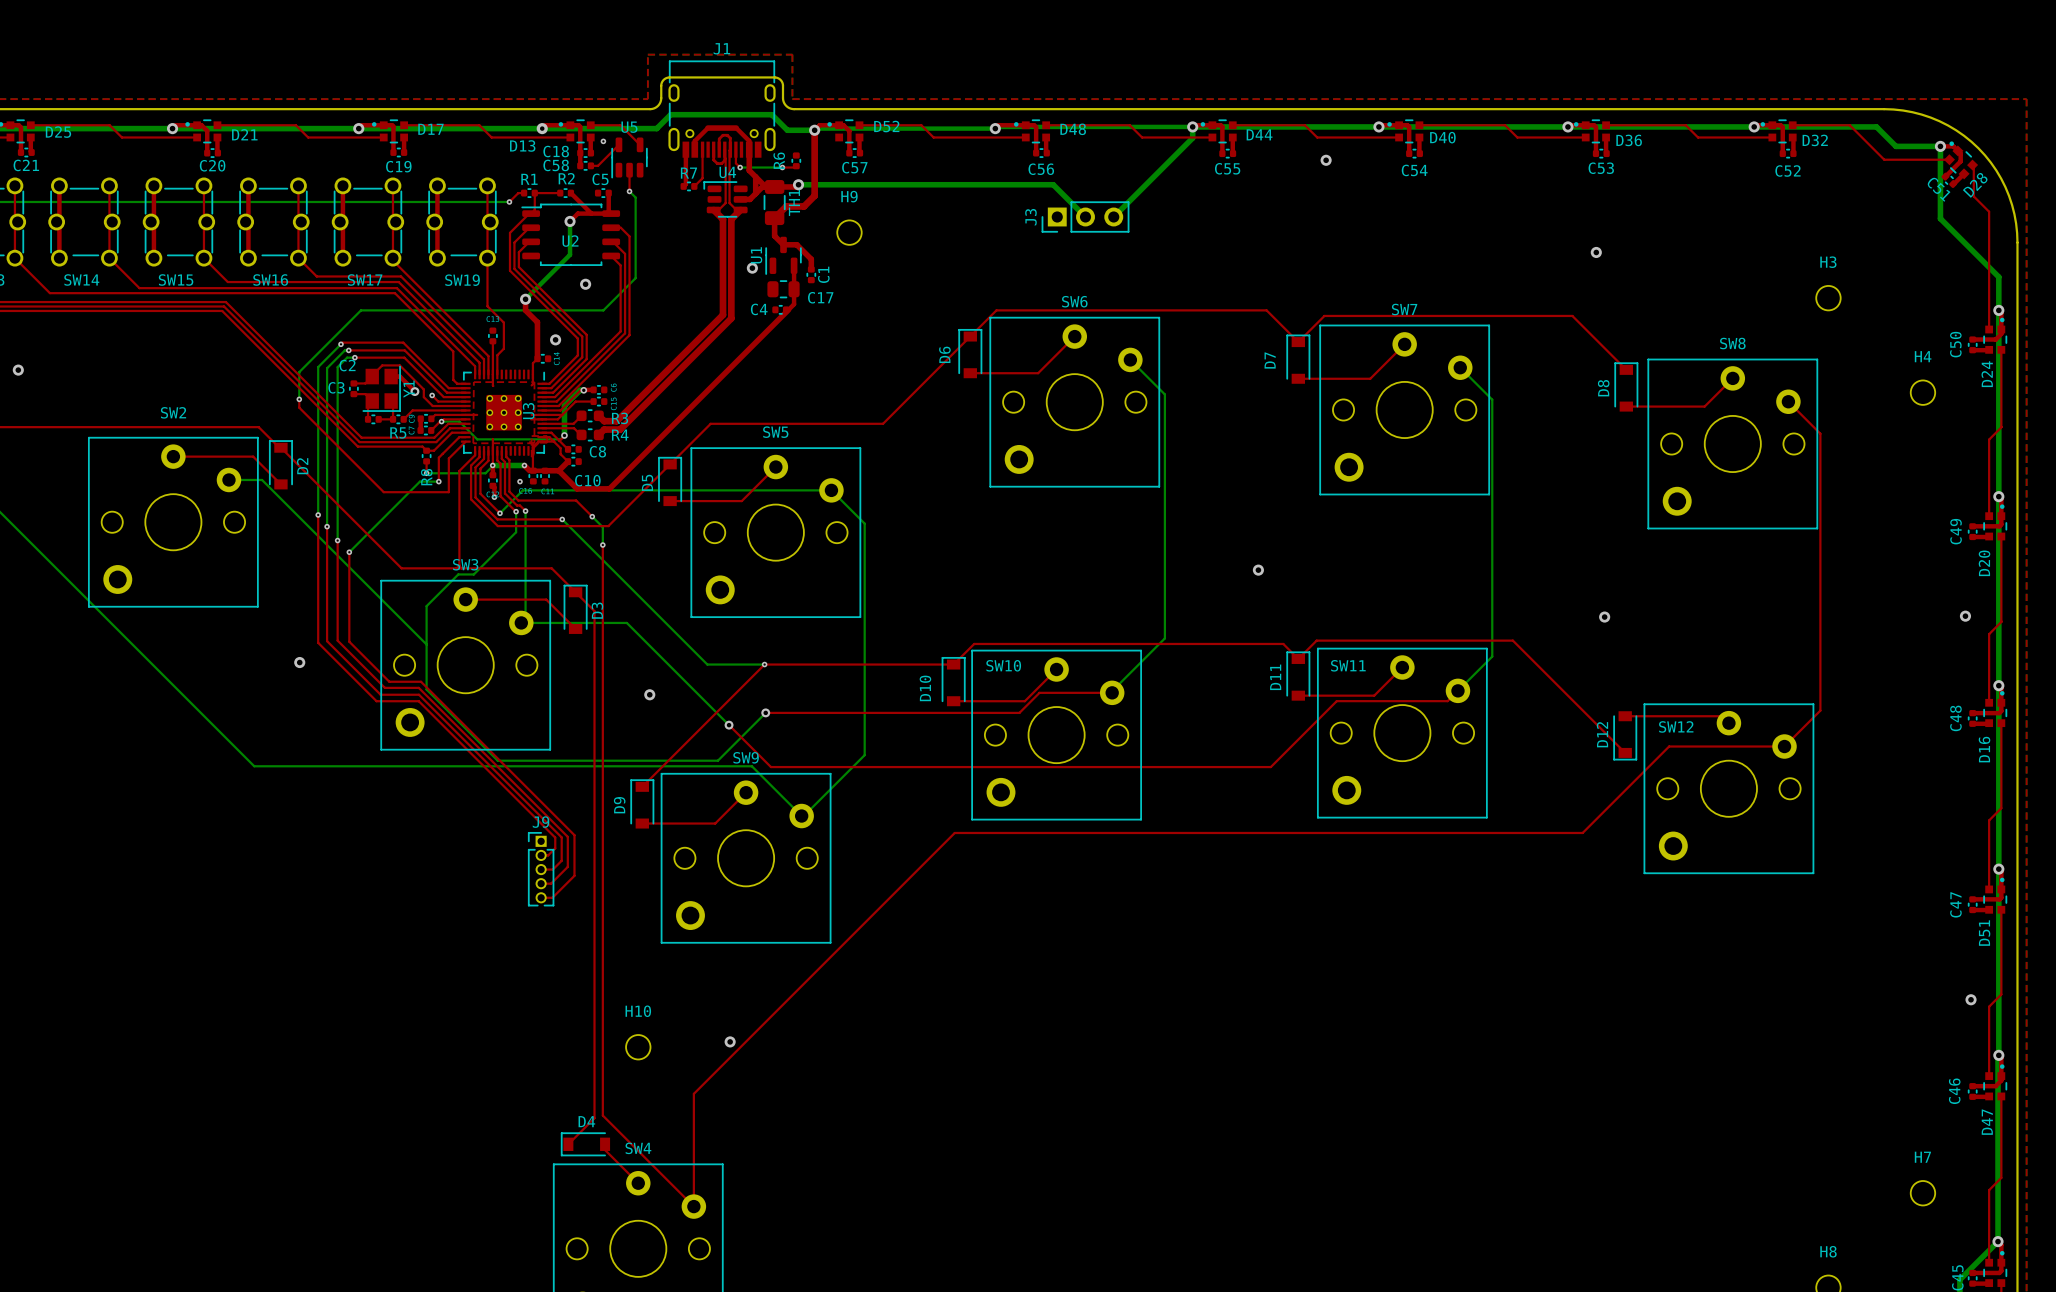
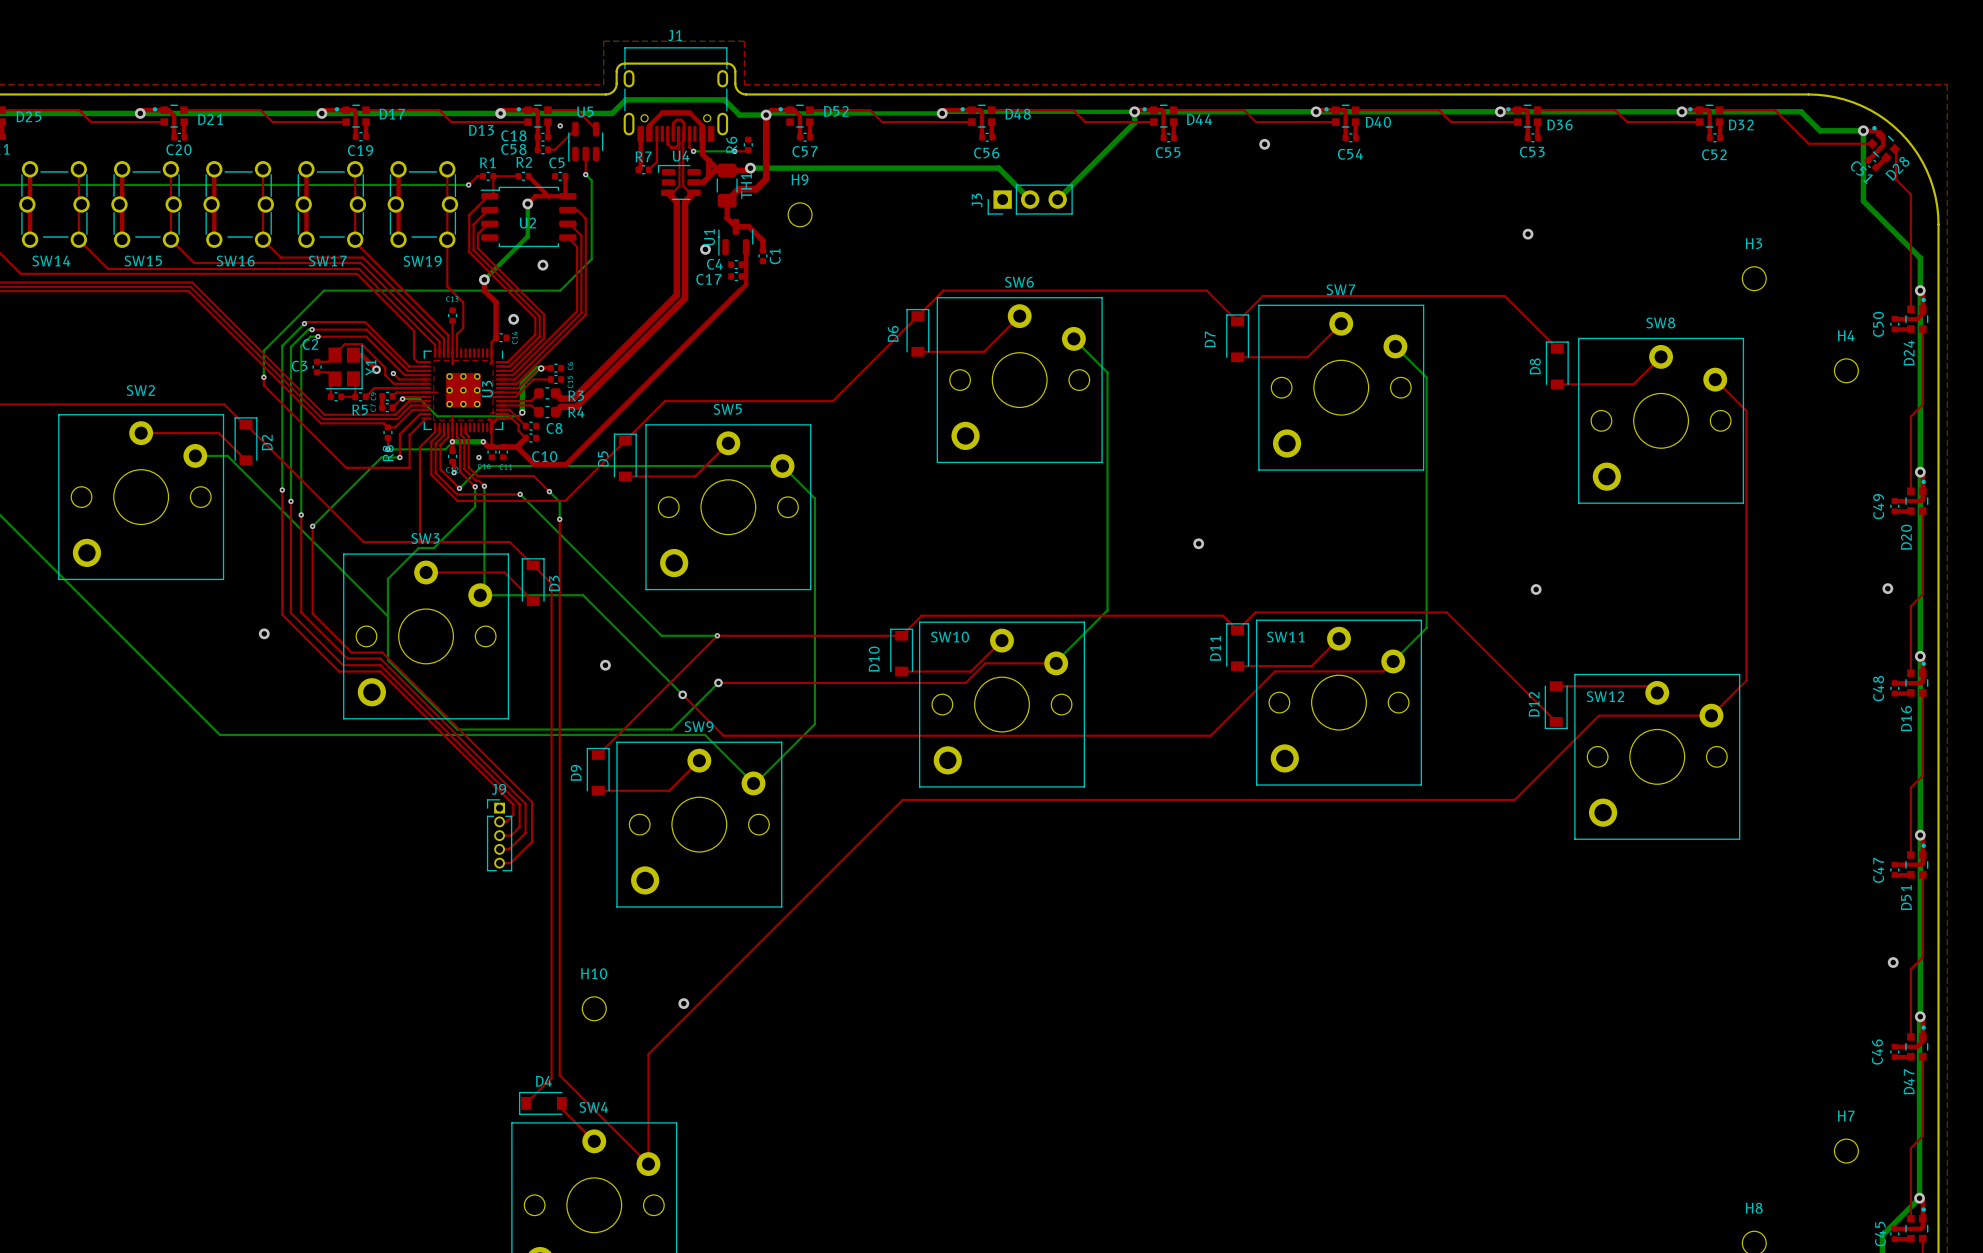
C17 footprint: [767, 280, 800, 299] -> [728, 271, 745, 282]
C17 name position: C17 (820, 297) -> C17 (708, 279)
C4 position: (780, 309) -> (736, 264)

